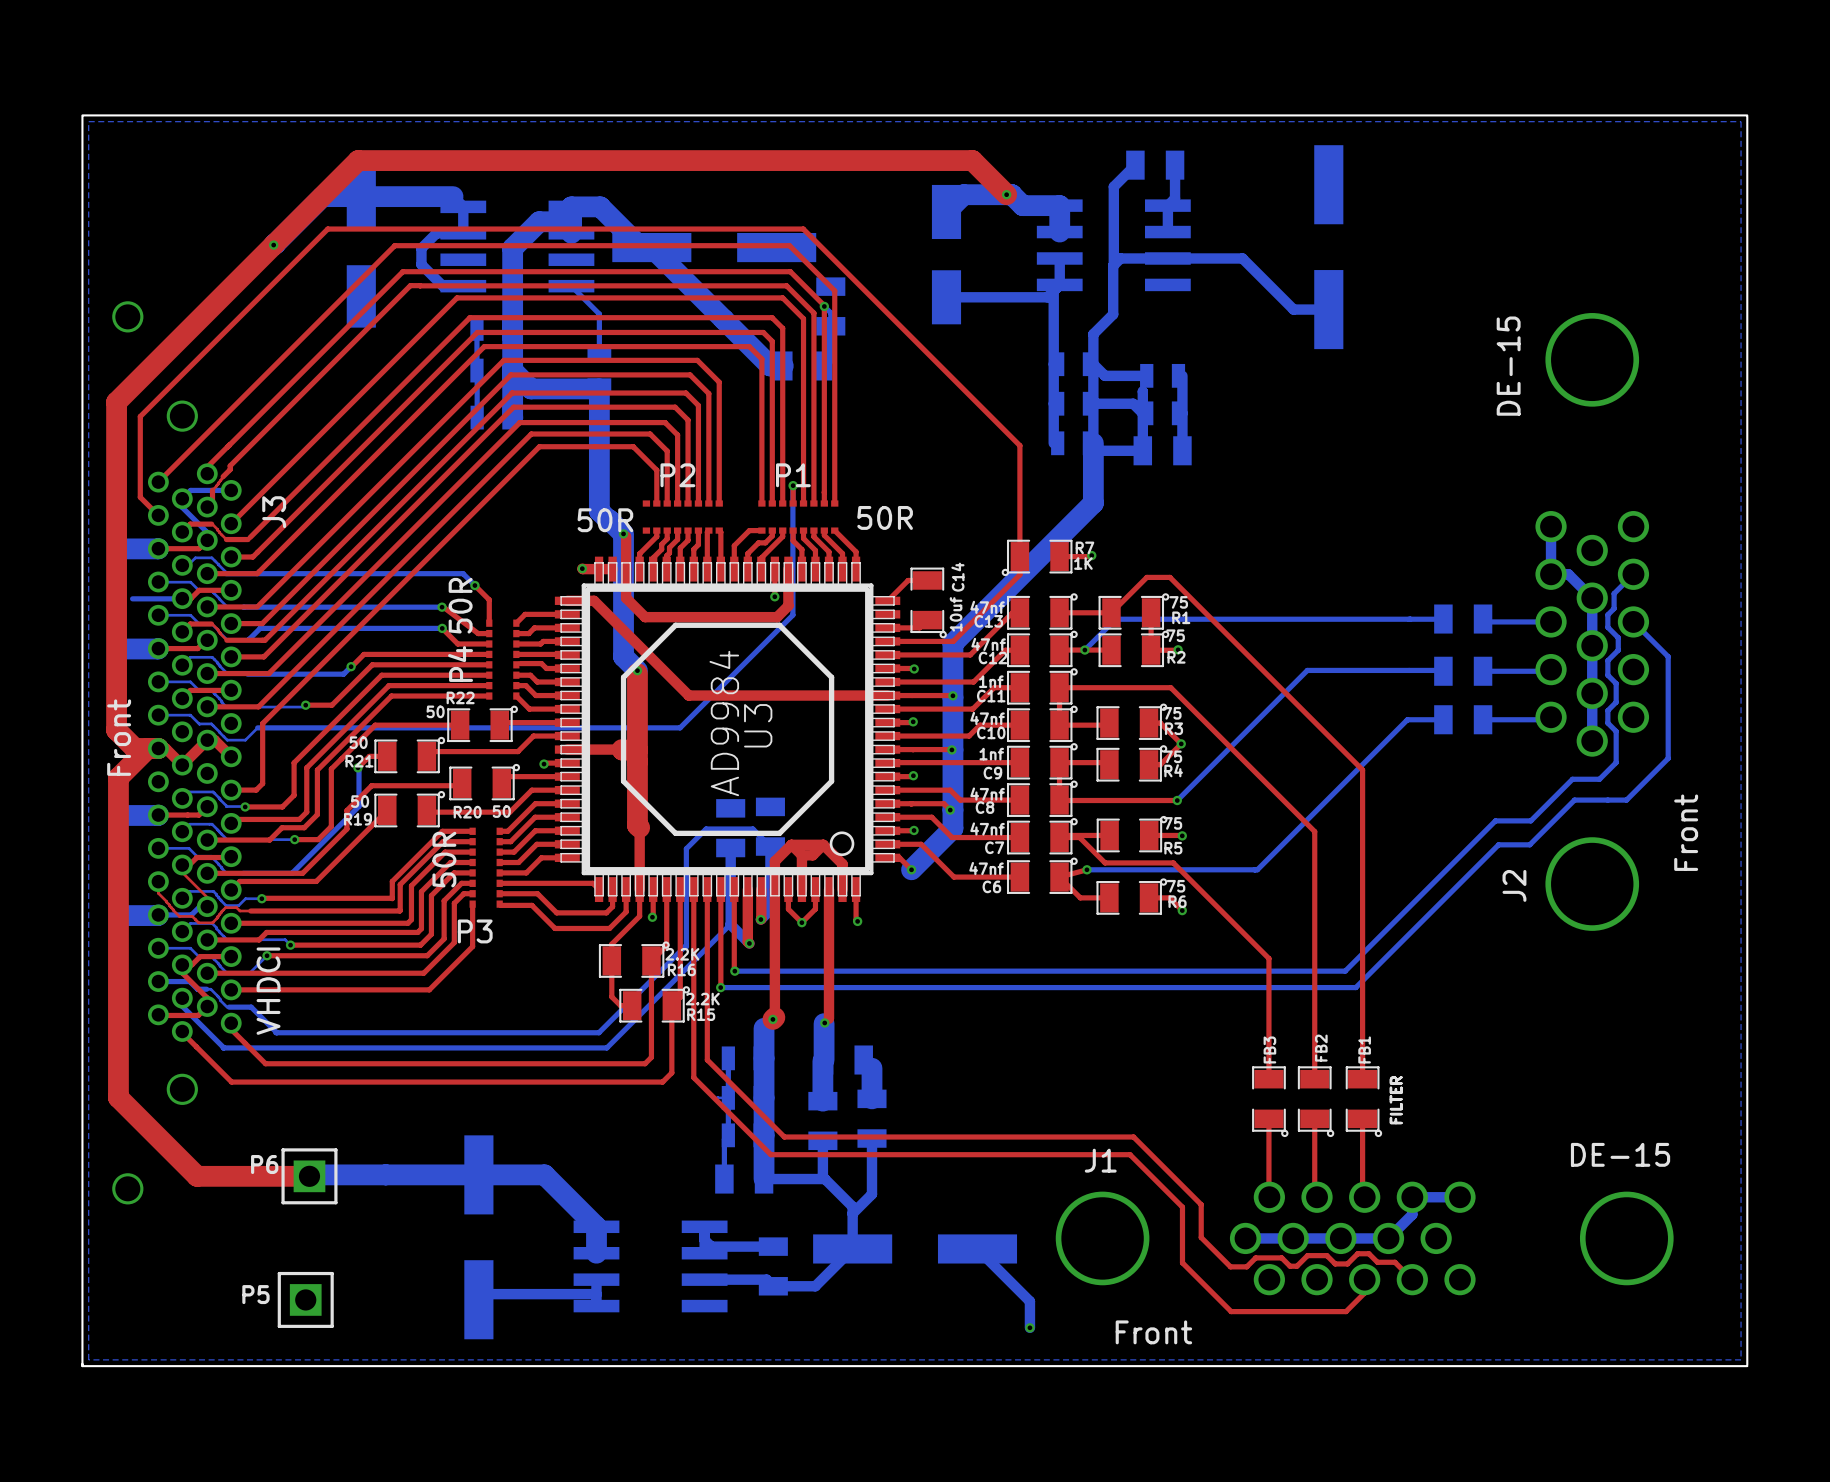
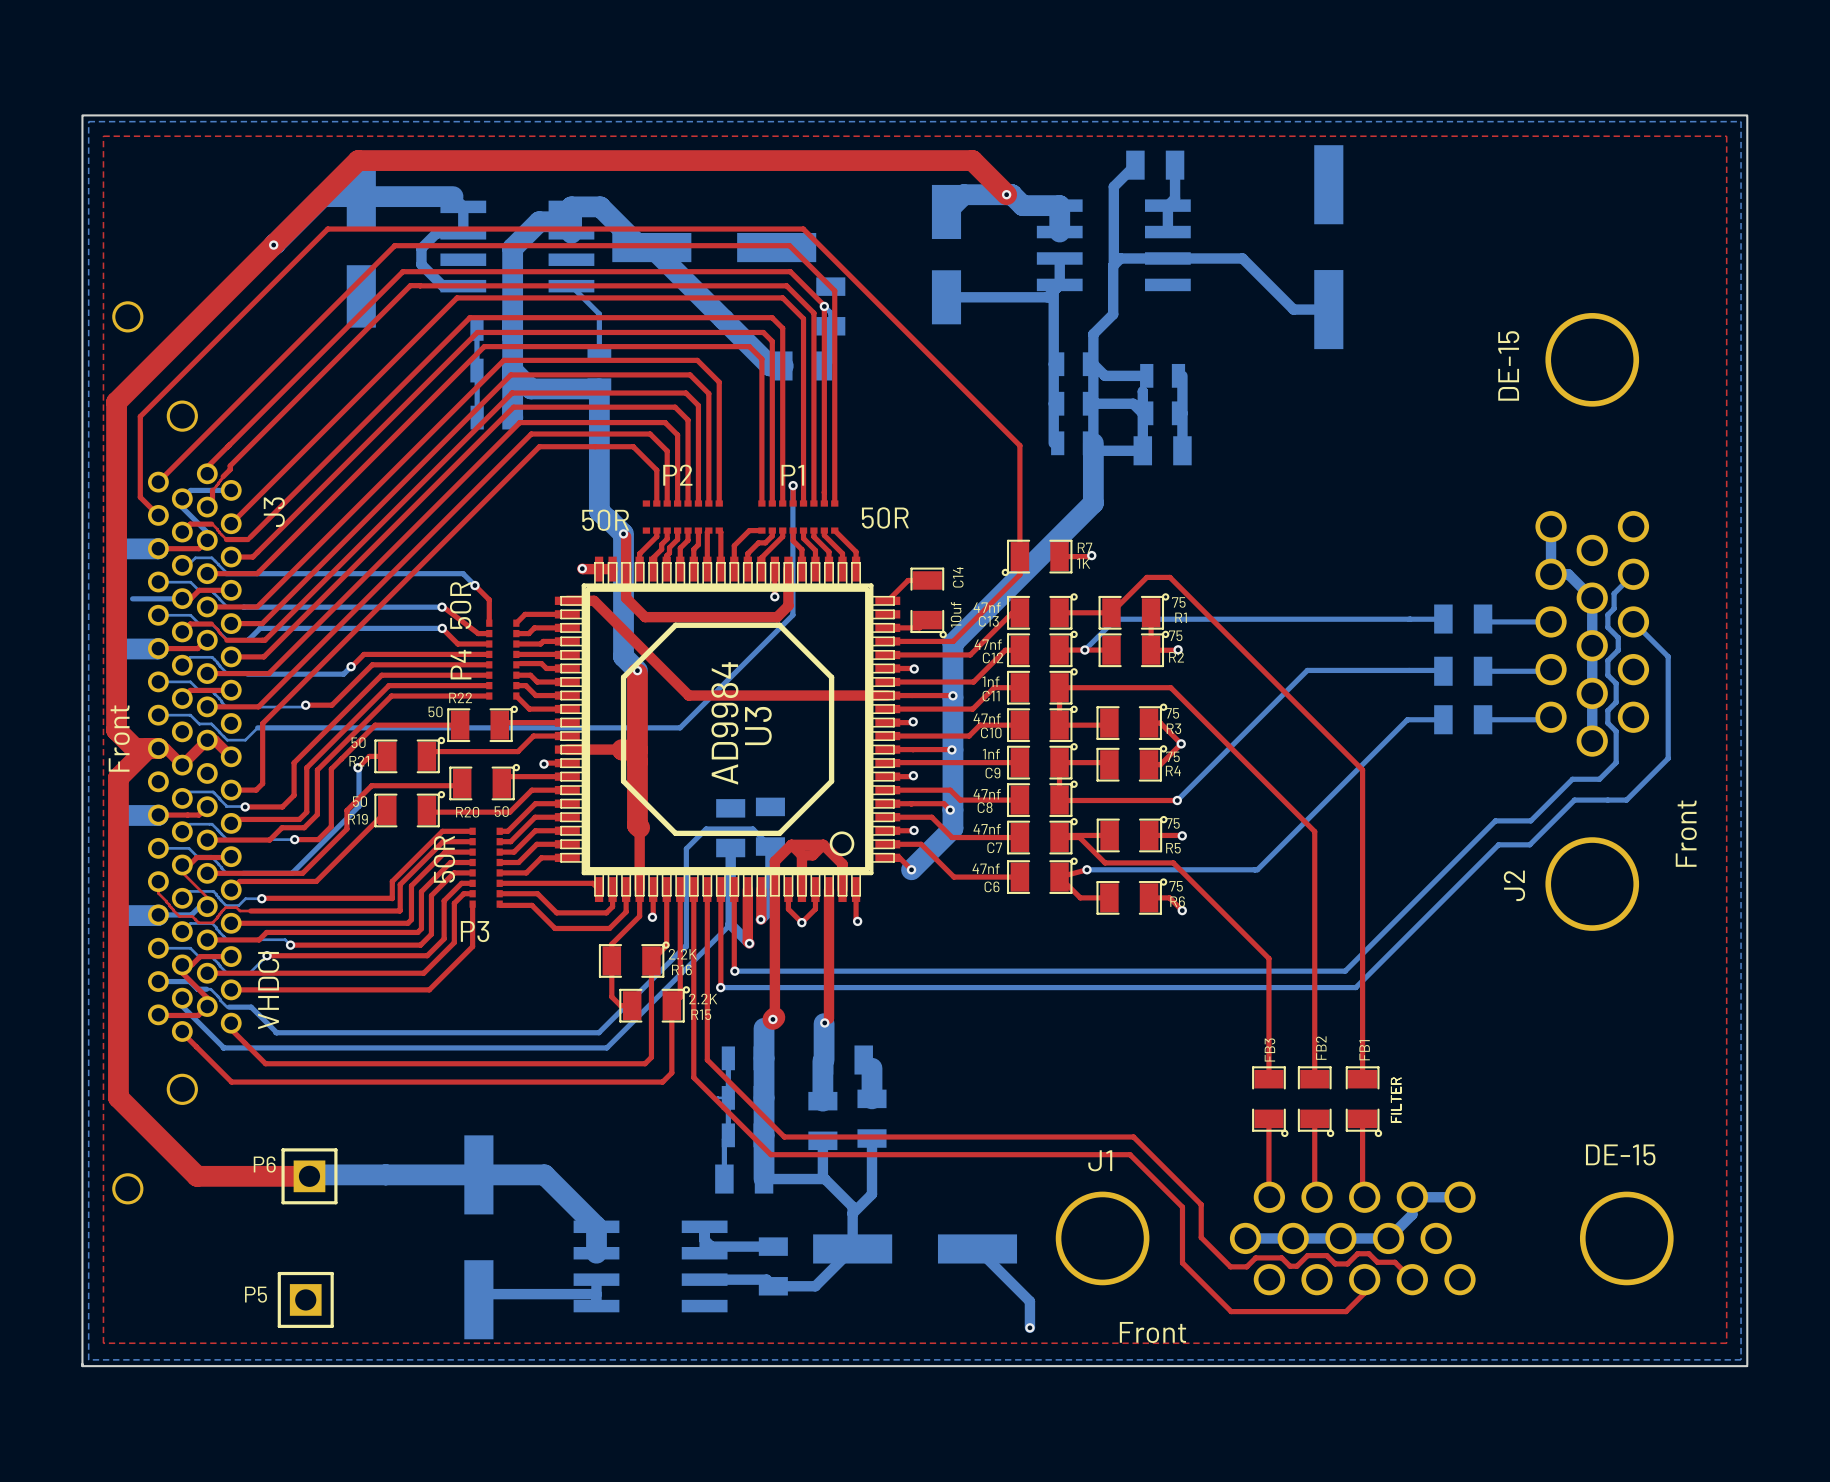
top zone outline: none -> (103, 136) (1726, 136) (1726, 1343) (103, 1343) (103, 136)

